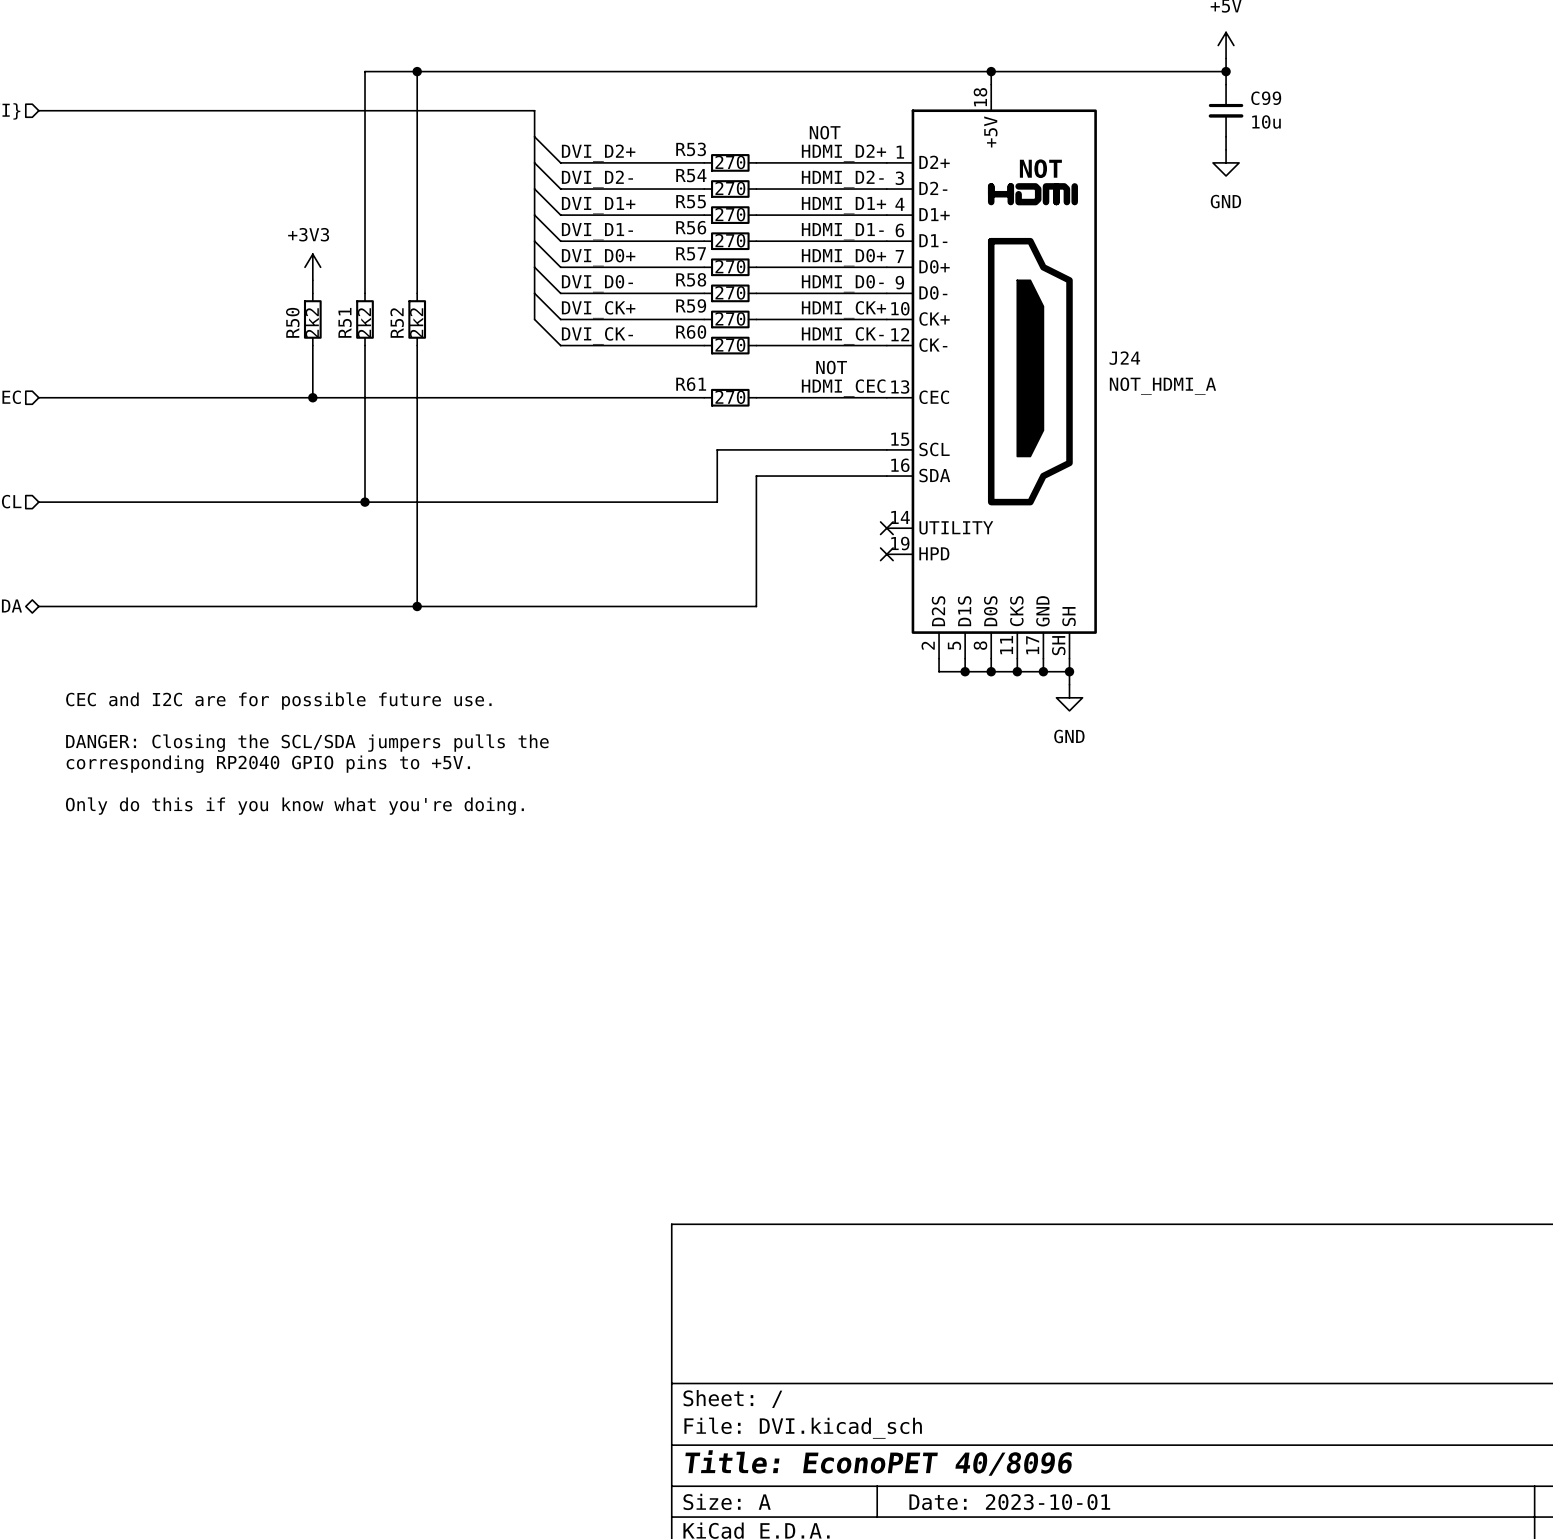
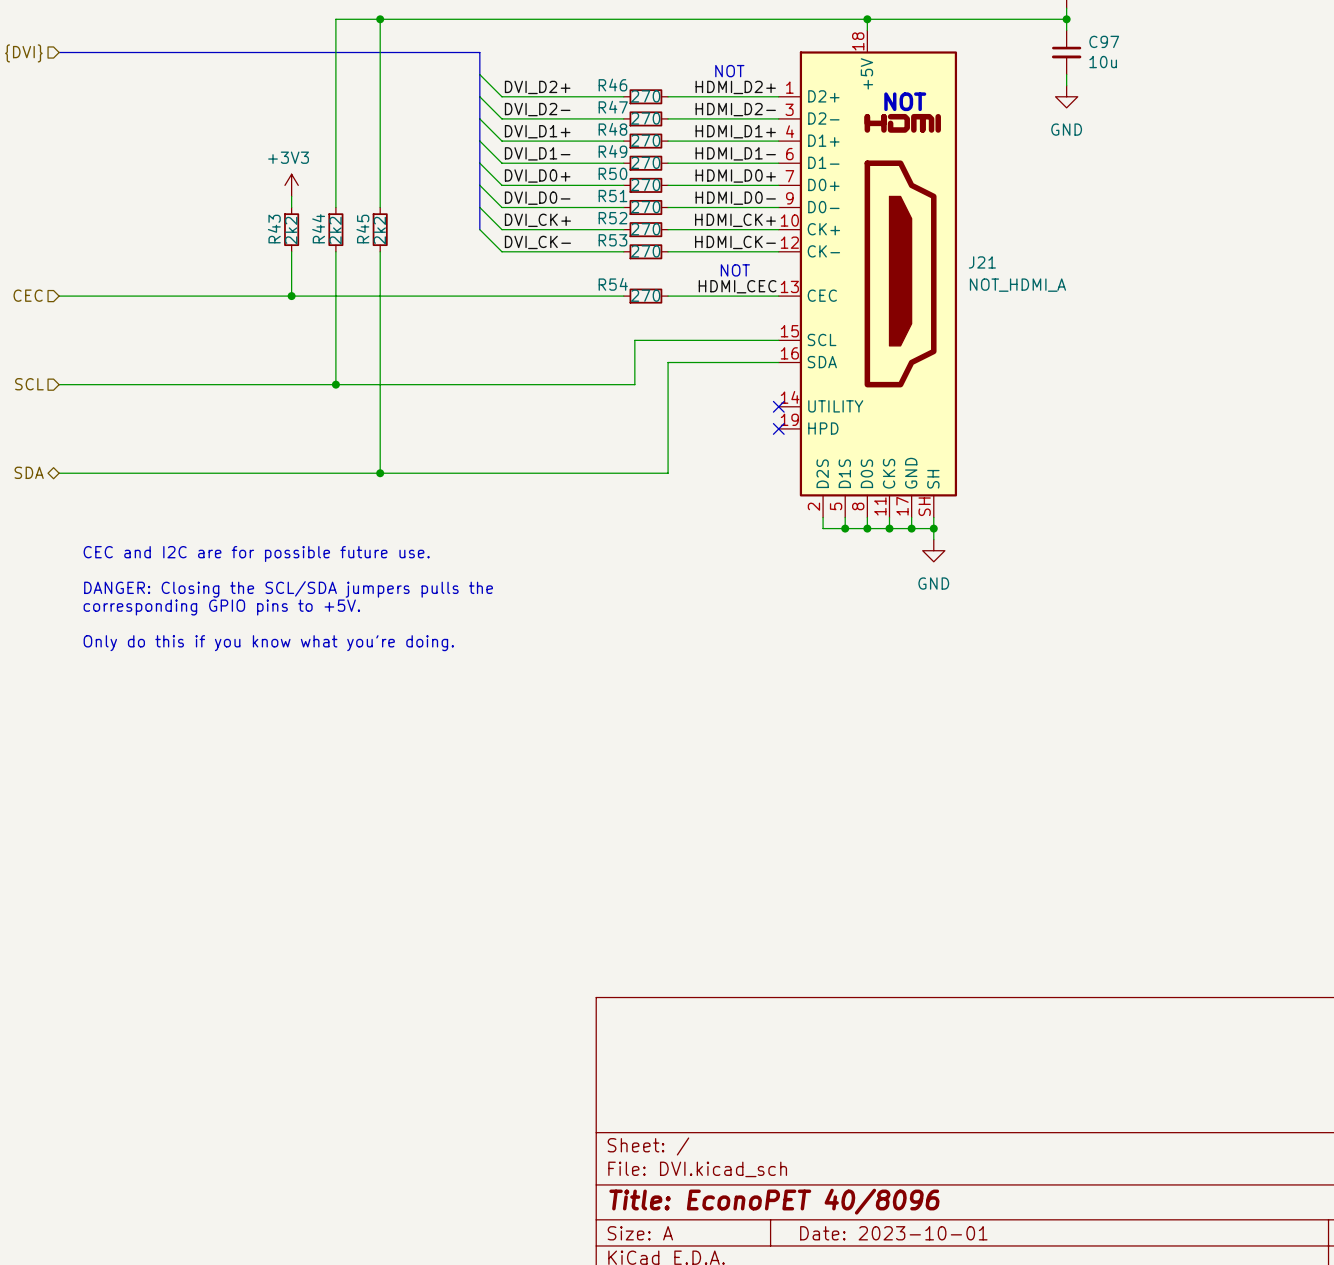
C99 name: C99 (1266, 98) -> C97 (1104, 41)
R53 name: R53 (691, 149) -> R46 (612, 85)
R54 name: R54 (691, 175) -> R47 (613, 107)
R55 name: R55 (691, 201) -> R48 (612, 129)
R56 name: R56 (691, 227) -> R49 (612, 151)
R57 name: R57 (691, 253) -> R50 (612, 173)
R58 name: R58 (691, 279) -> R51 (612, 196)
R59 name: R59 (691, 305) -> R52 (612, 218)
R50 name: R50 (292, 322) -> R43 (274, 229)
R51 name: R51 (345, 322) -> R44 (318, 228)
R52 name: R52 (397, 323) -> R45 (362, 229)
R60 name: R60 (691, 332) -> R53 (612, 240)
J24 name: J24 (1124, 358) -> J21 (982, 262)
R61 name: R61 (691, 384) -> R54 (613, 284)
text: corresponding RP2040 GPIO pins to +5V. (268, 764) -> corresponding GPIO pins to +5V. (221, 607)

